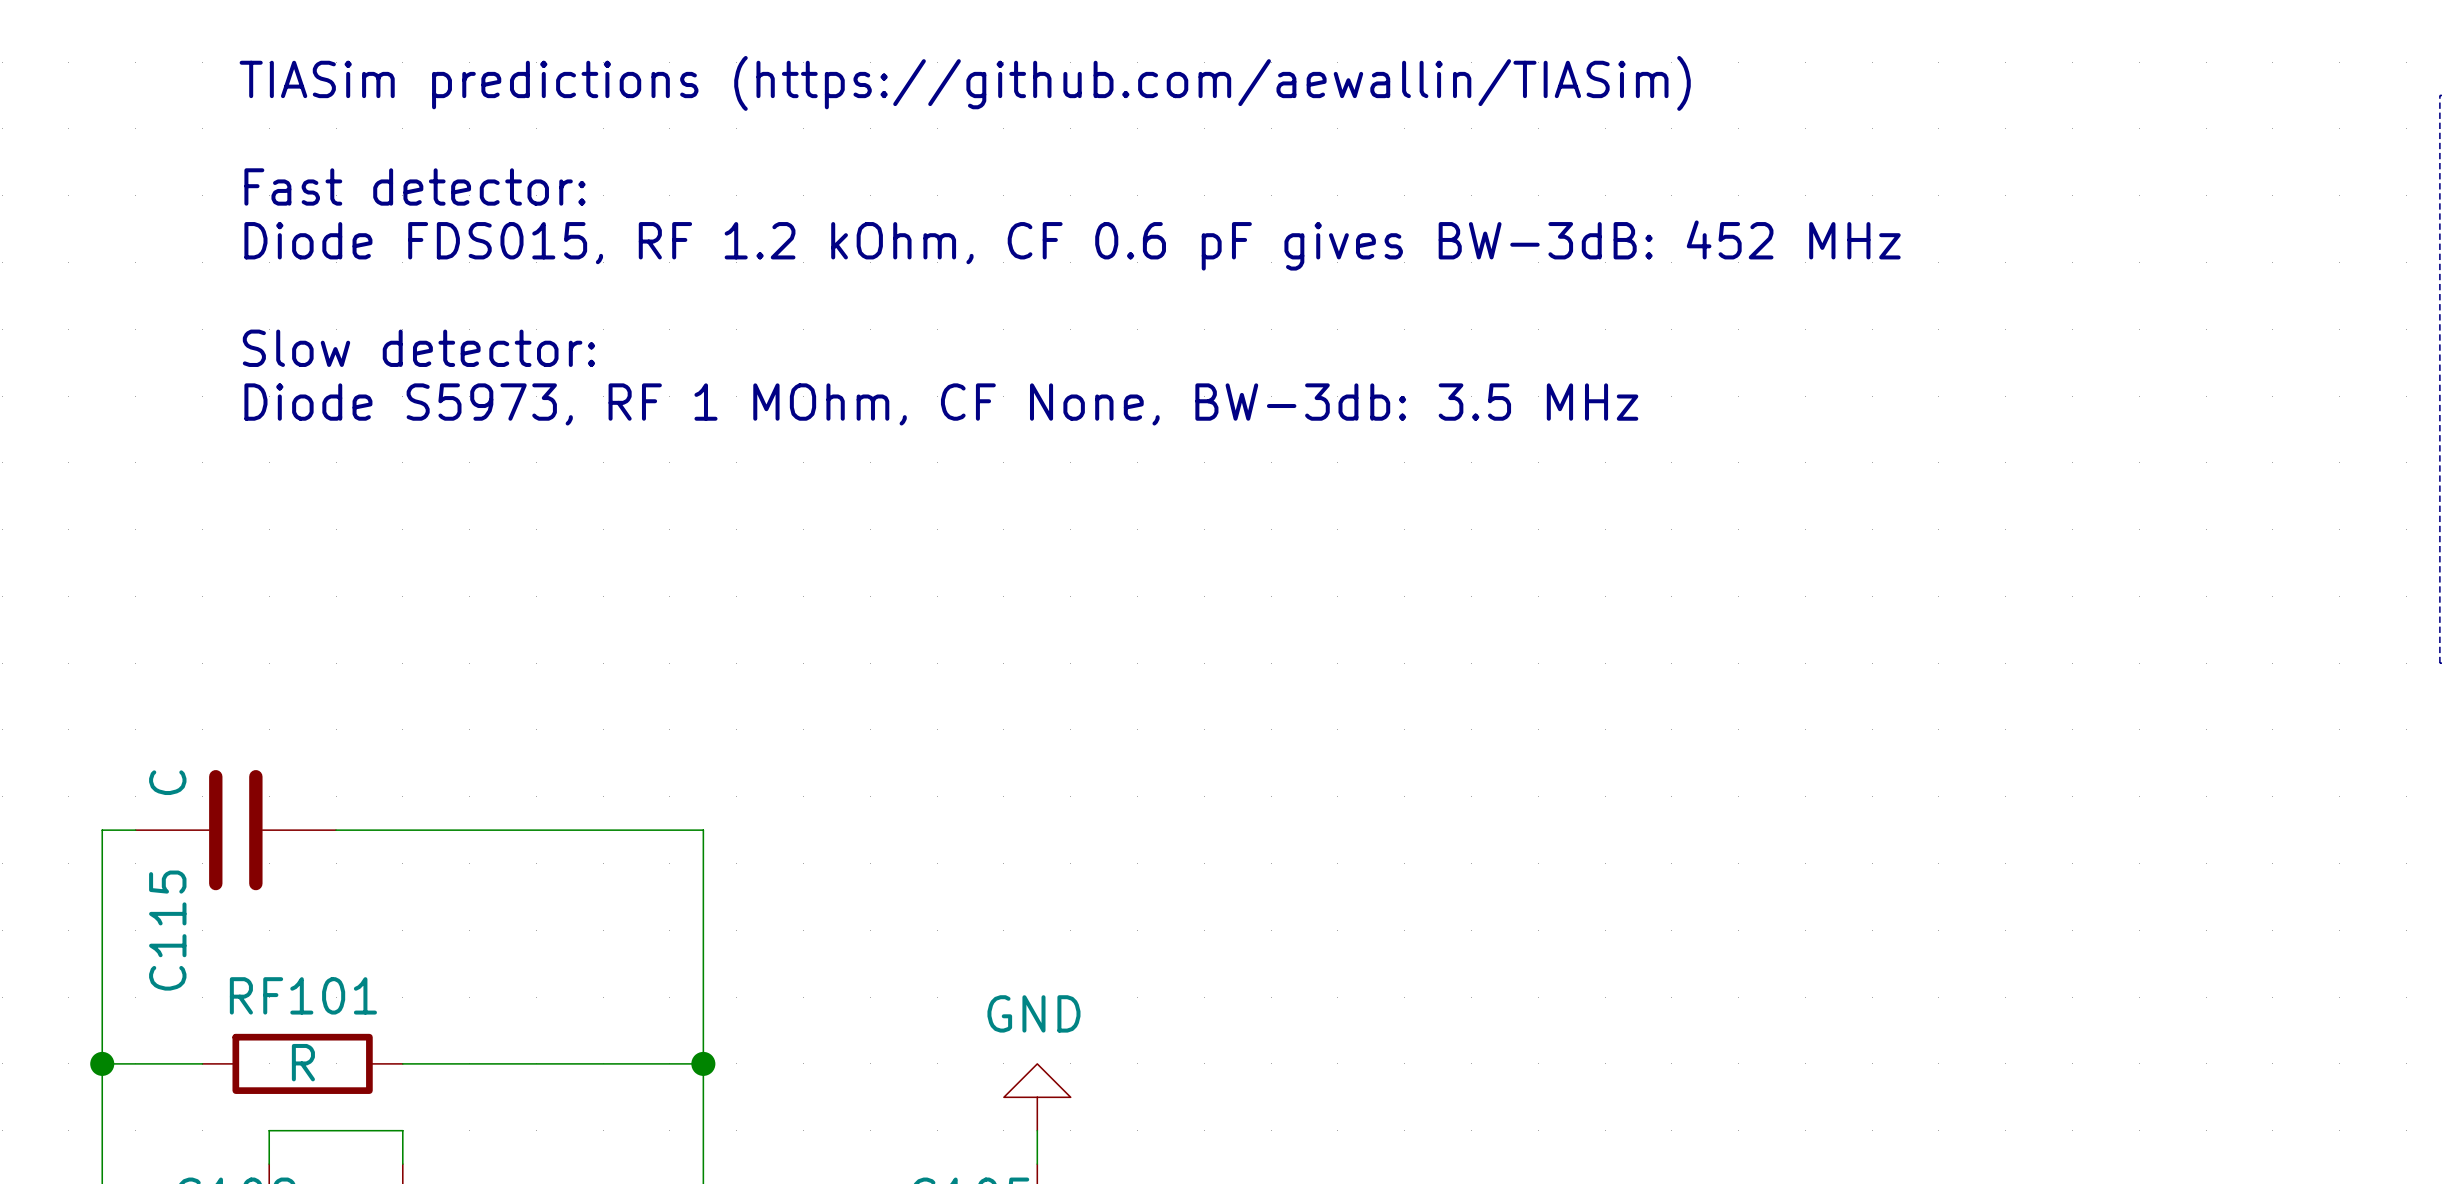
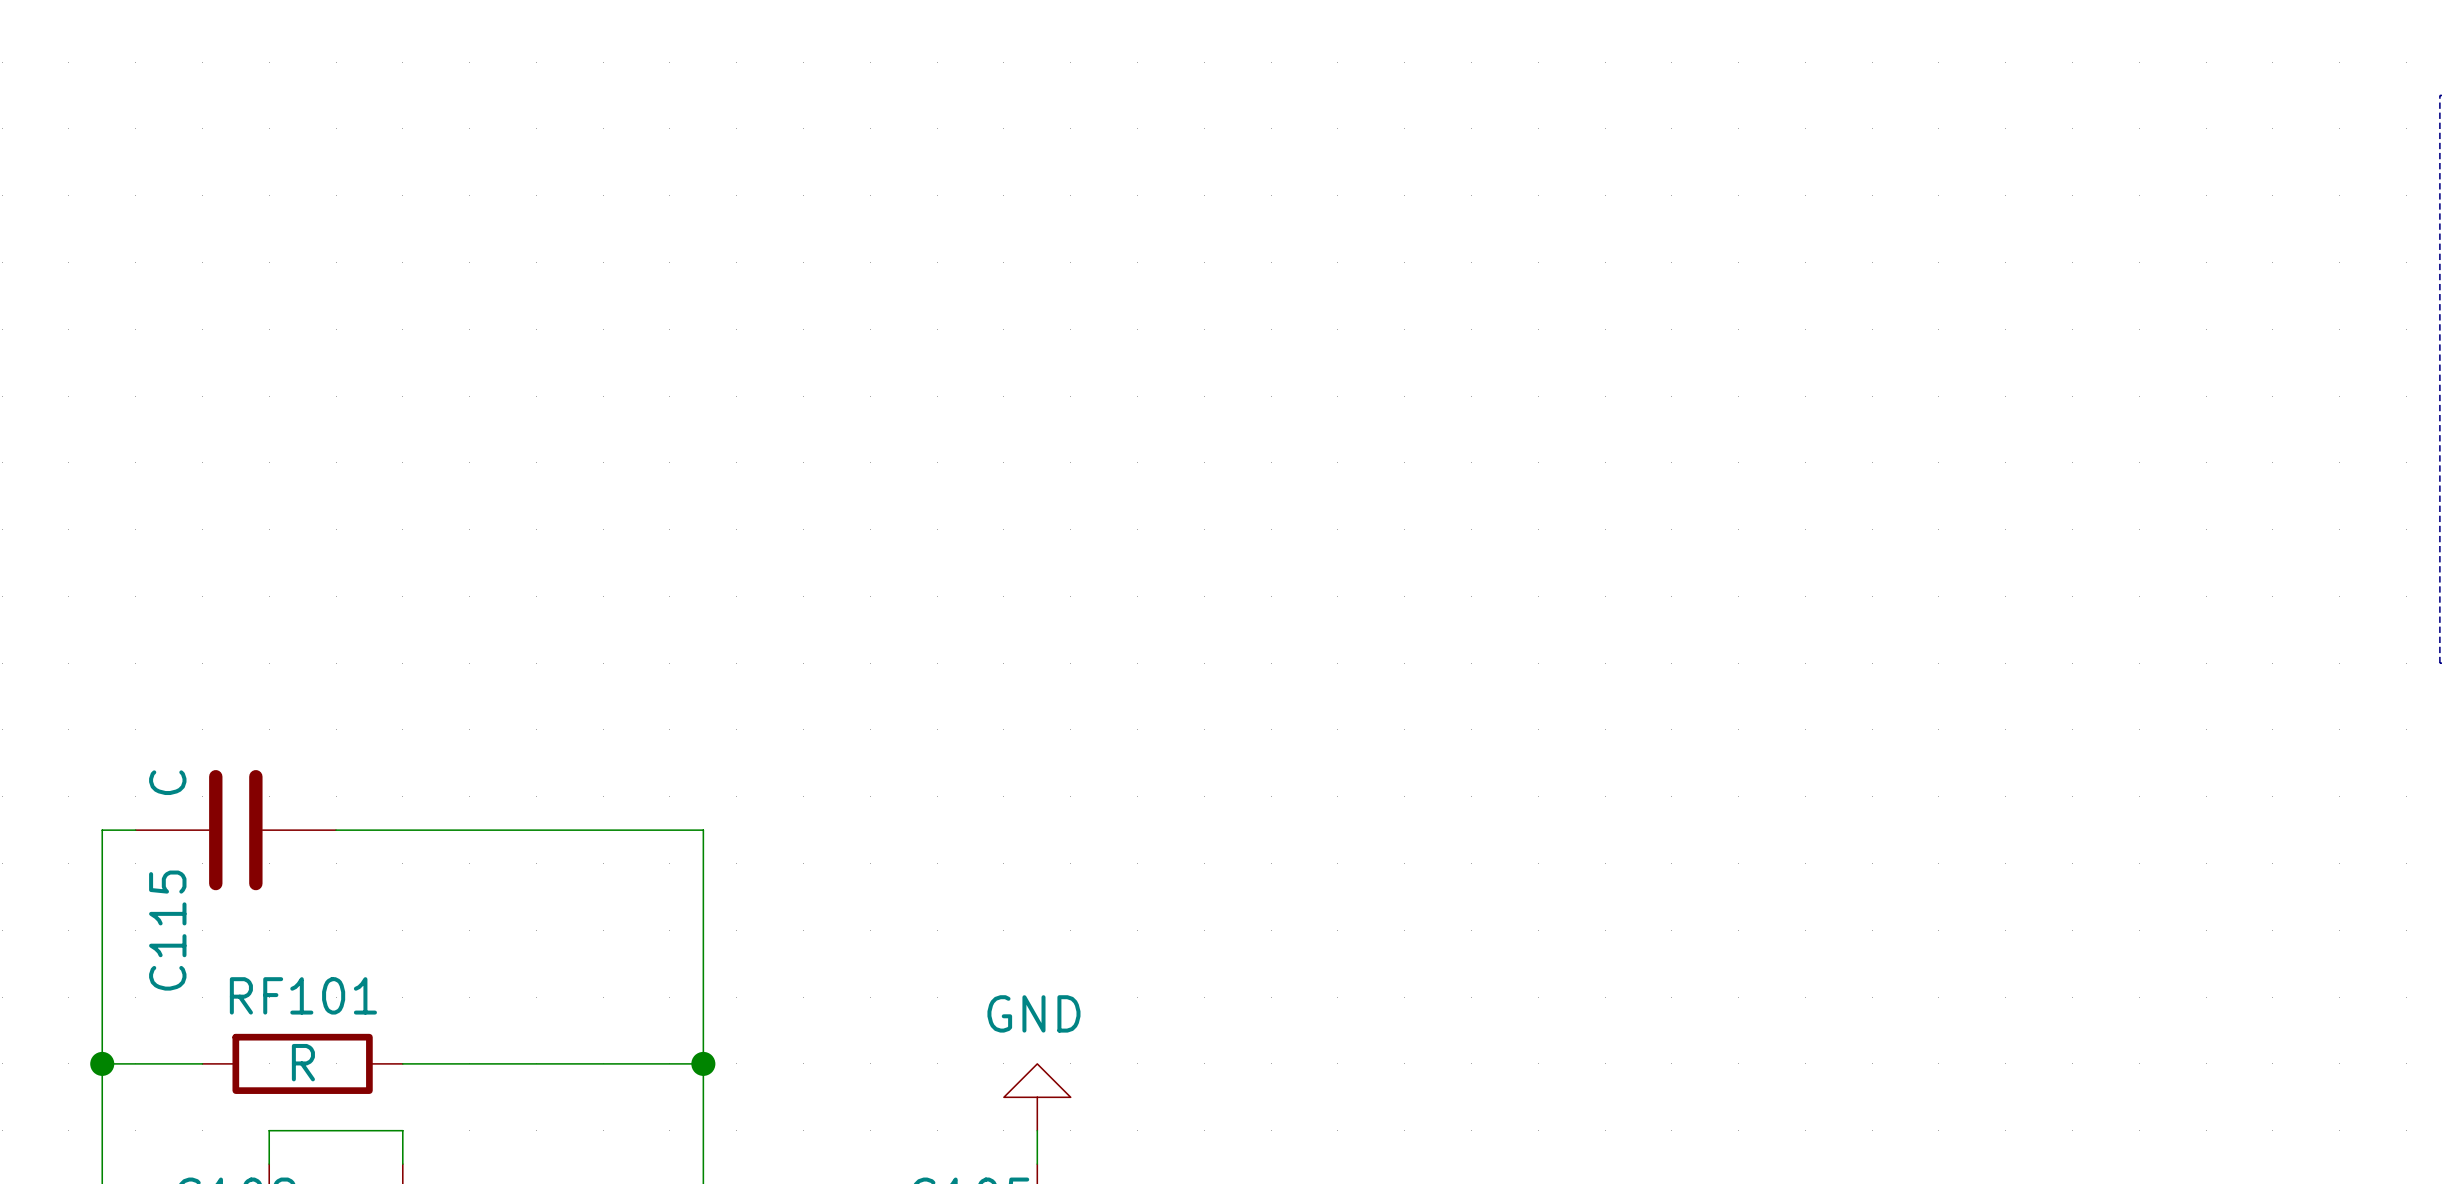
text: TIASim predictions (https://github.com/aewallin/TIASim) (965, 83) -> none
text: Fast detector: (414, 186) -> none
text: Diode FDS015, RF 1.2 kOhm, CF 0.6 pF gives BW-3dB: 452 MHz (1072, 245) -> none
text: Slow detector: (418, 348) -> none
text: Diode S5973, RF 1 MOhm, CF None, BW-3db: 3.5 MHz (941, 404) -> none

